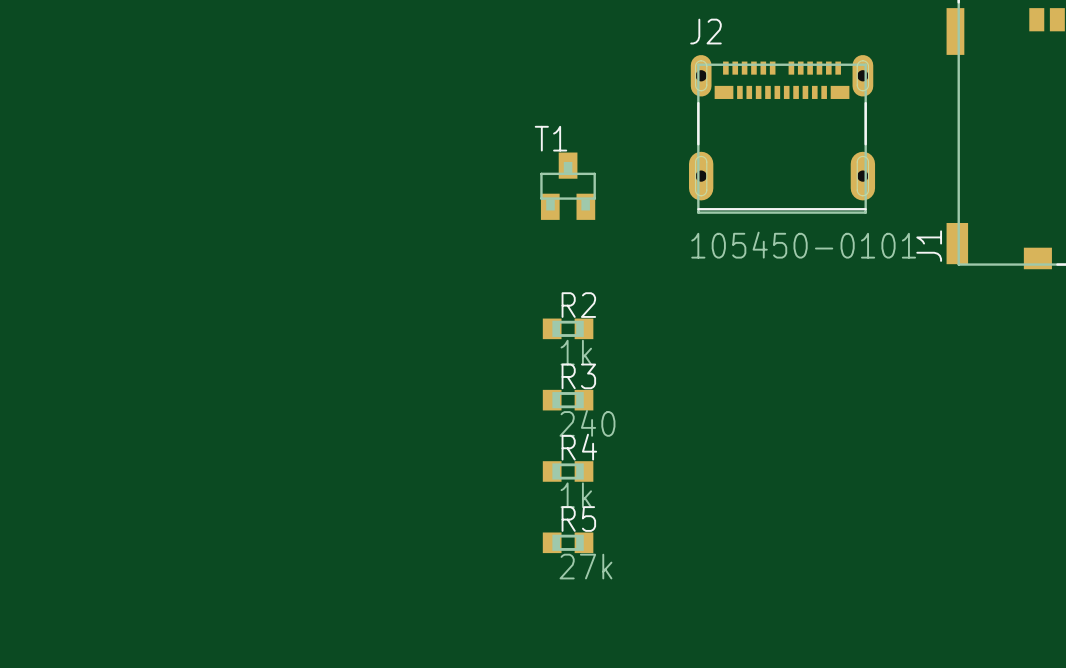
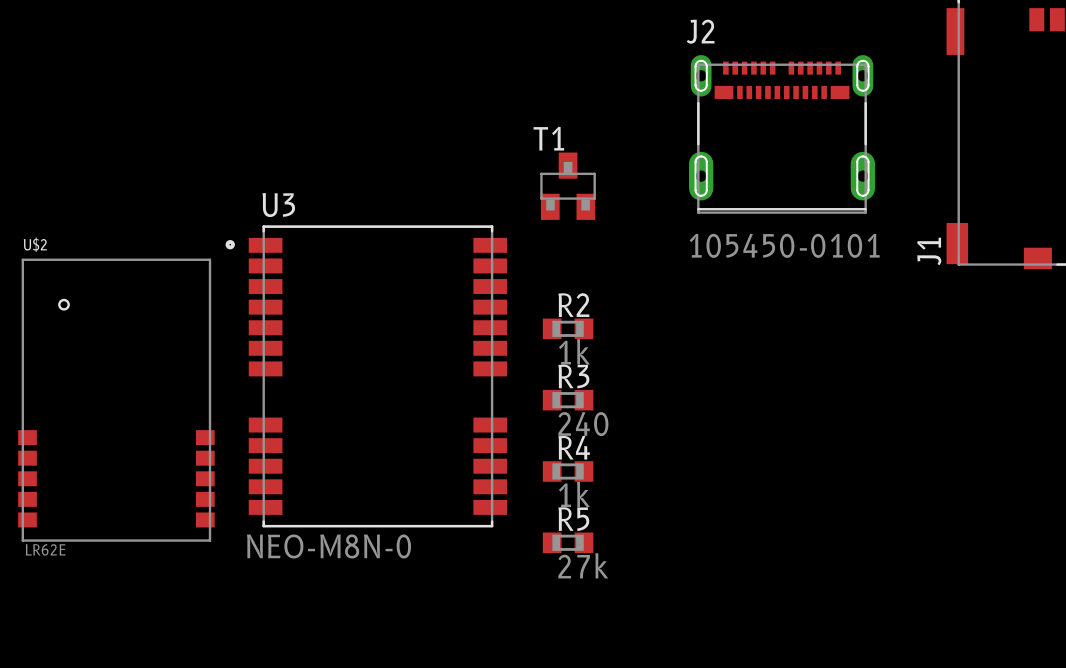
U3: none -> NEO-M8N-0 (366, 376)
U$2: none -> LR62E (116, 400)

